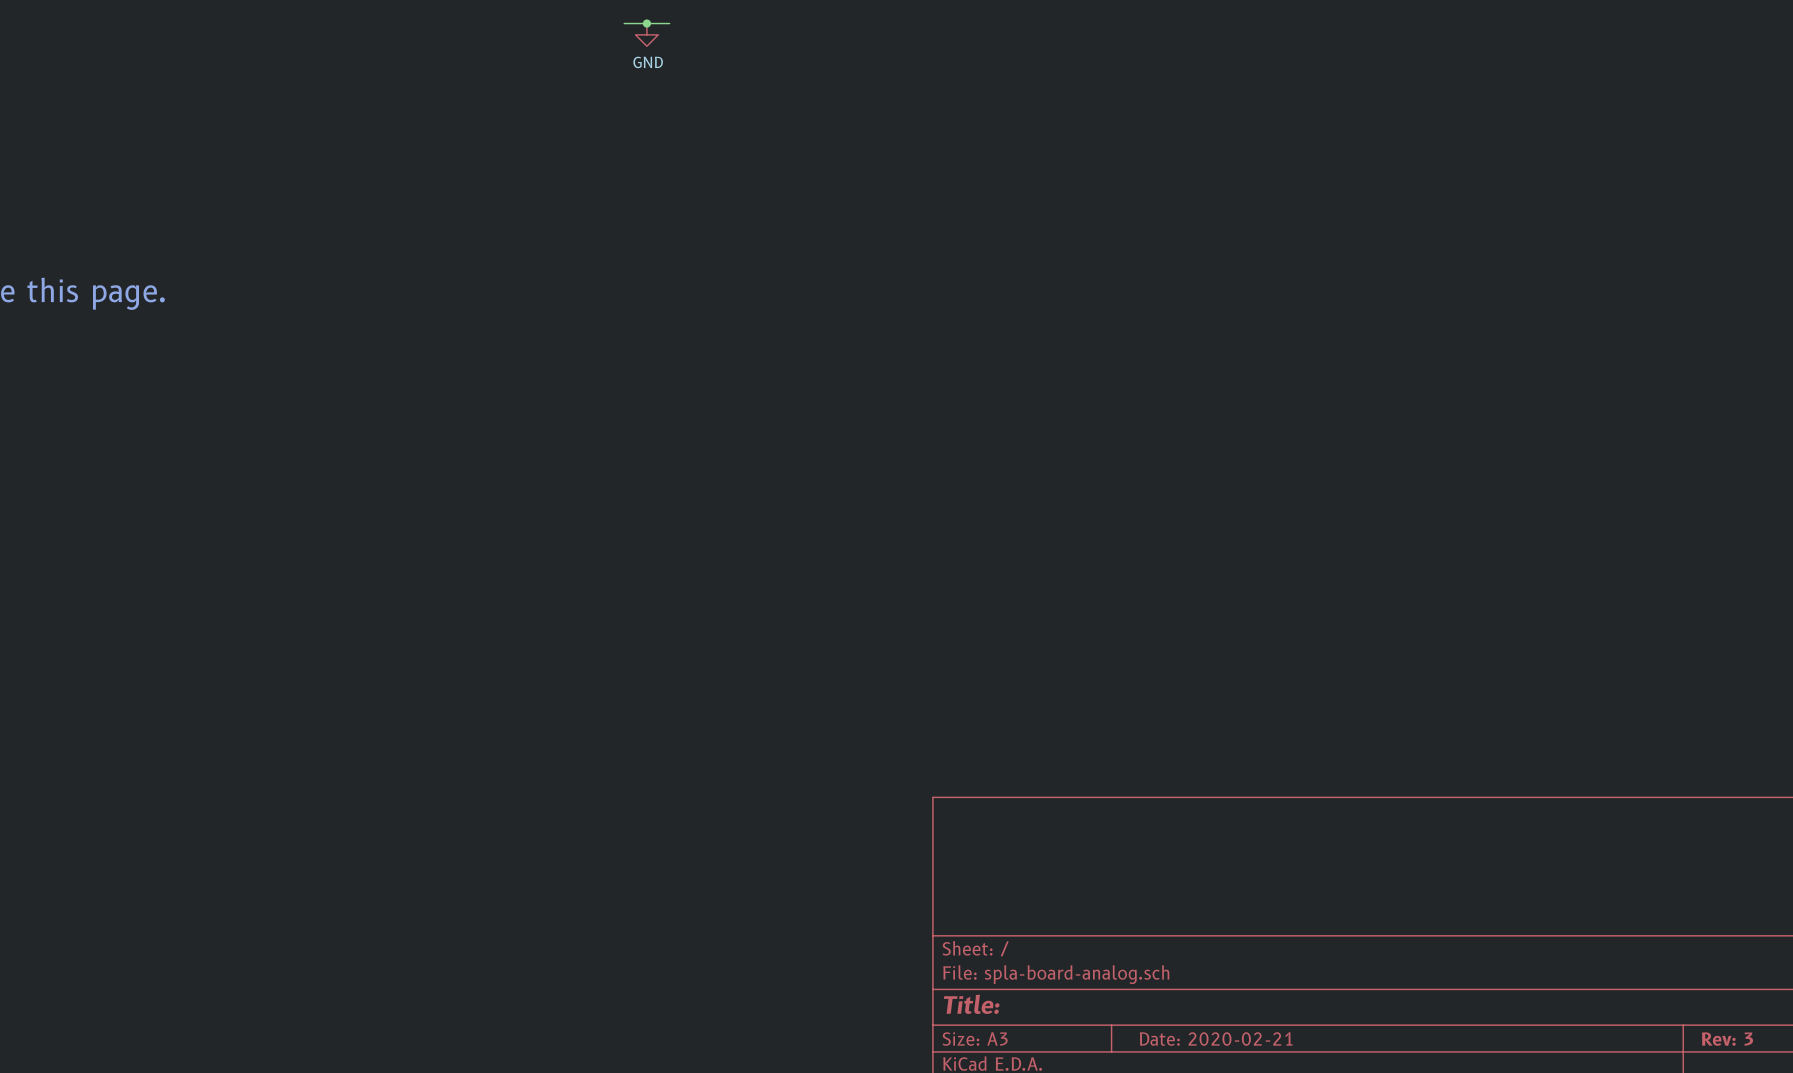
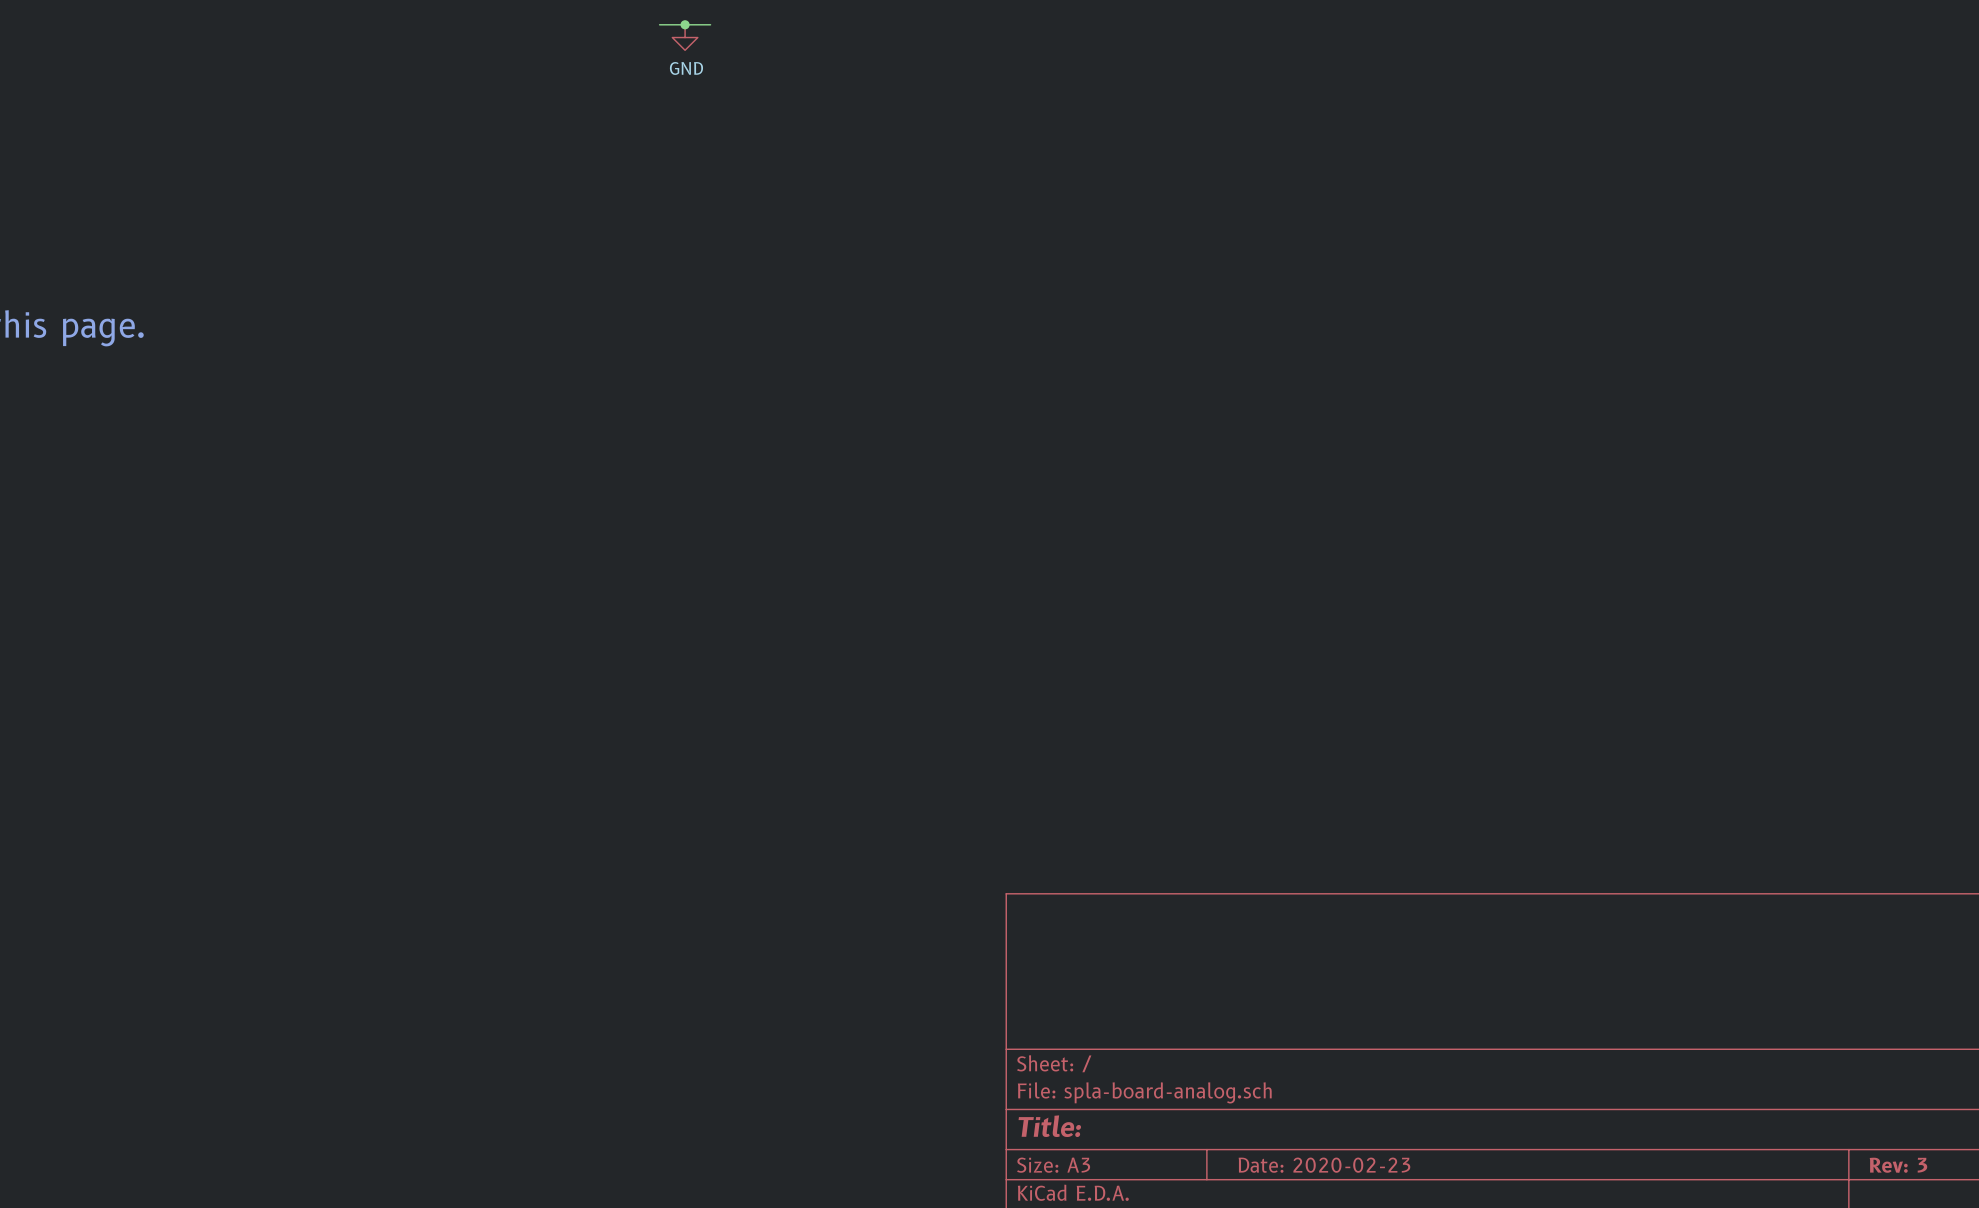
title block: Date: 2020-02-21 (1216, 1039) -> Date: 2020-02-23 (1324, 1165)

